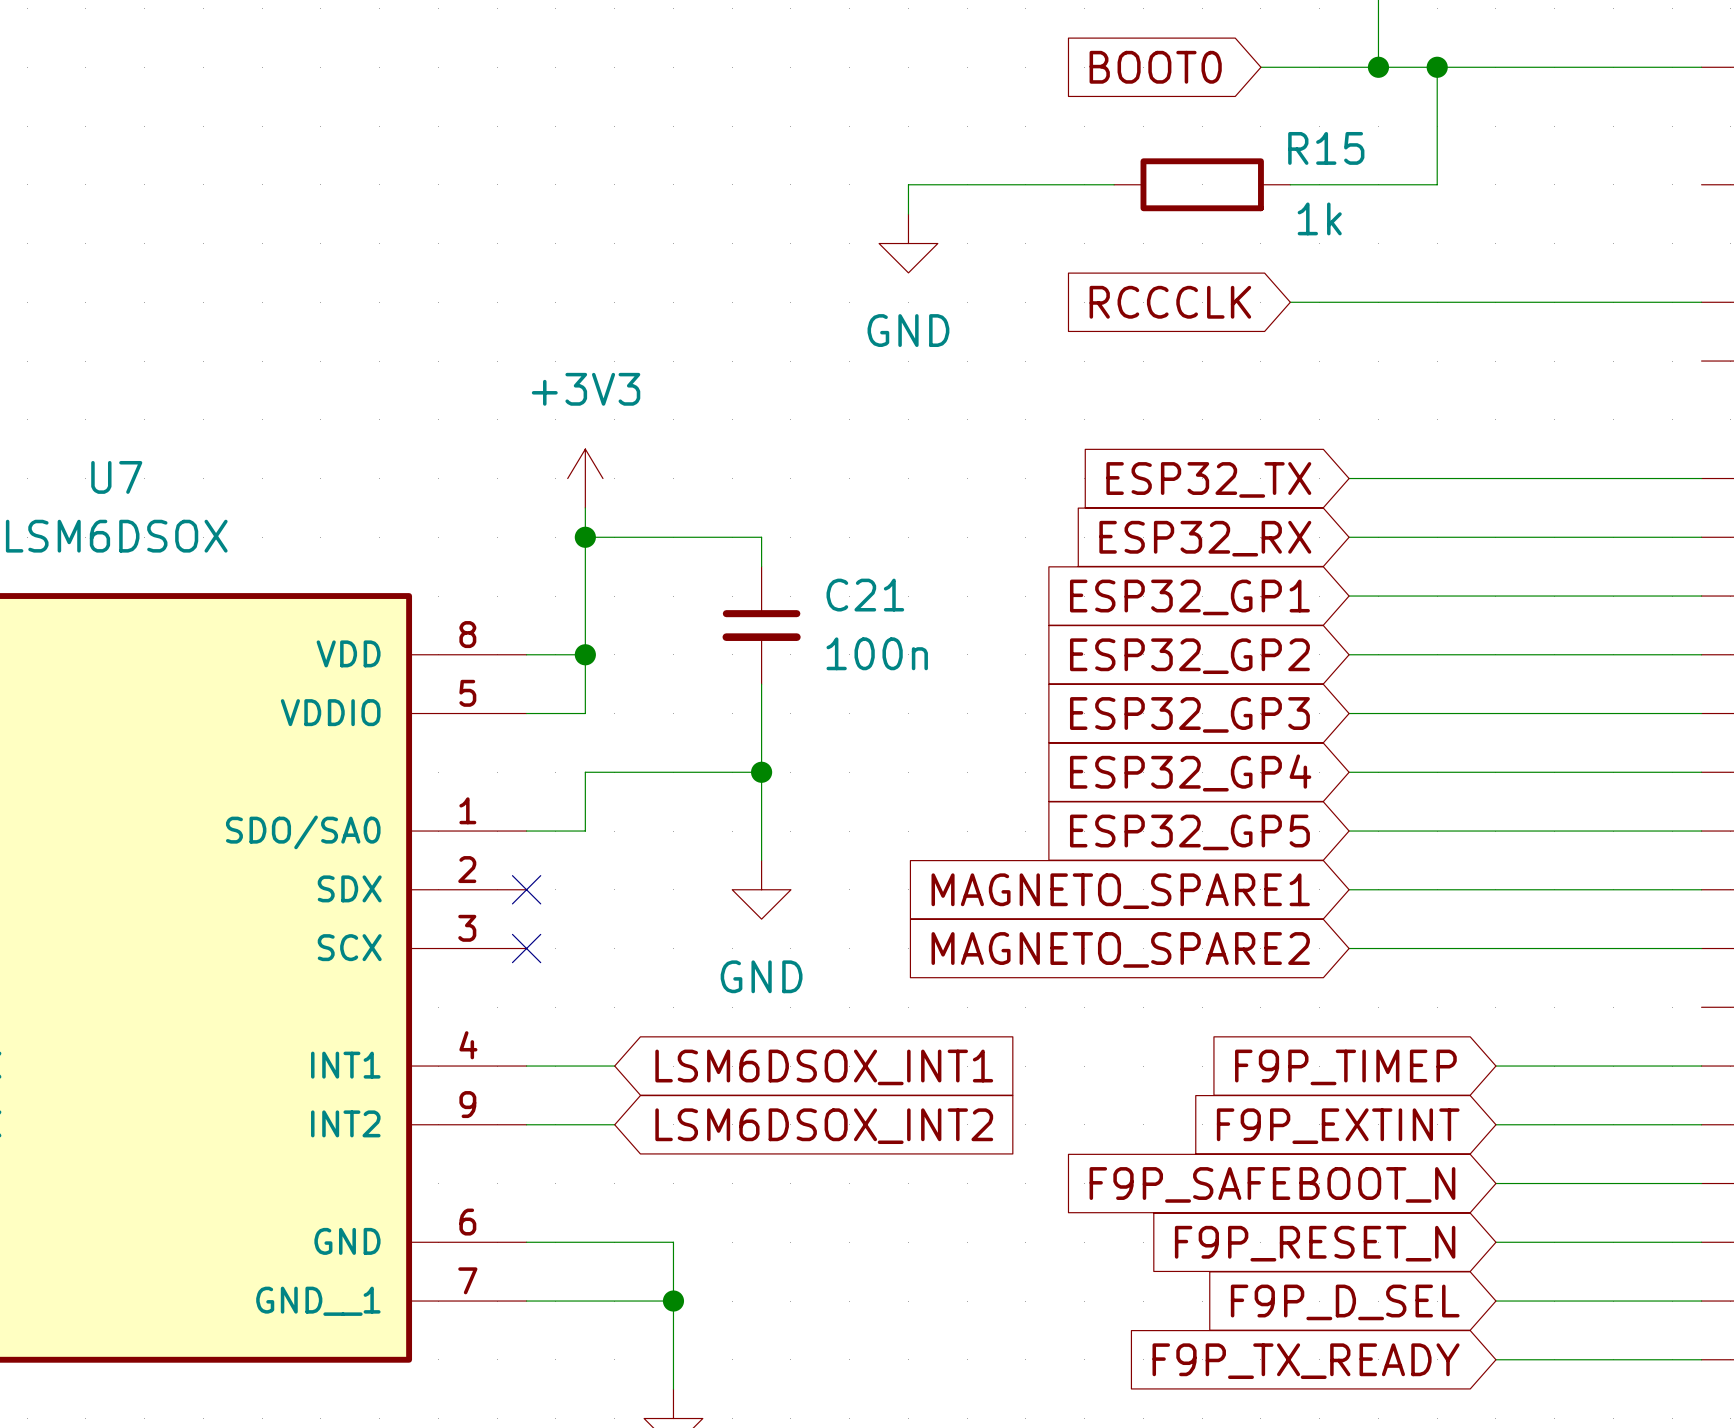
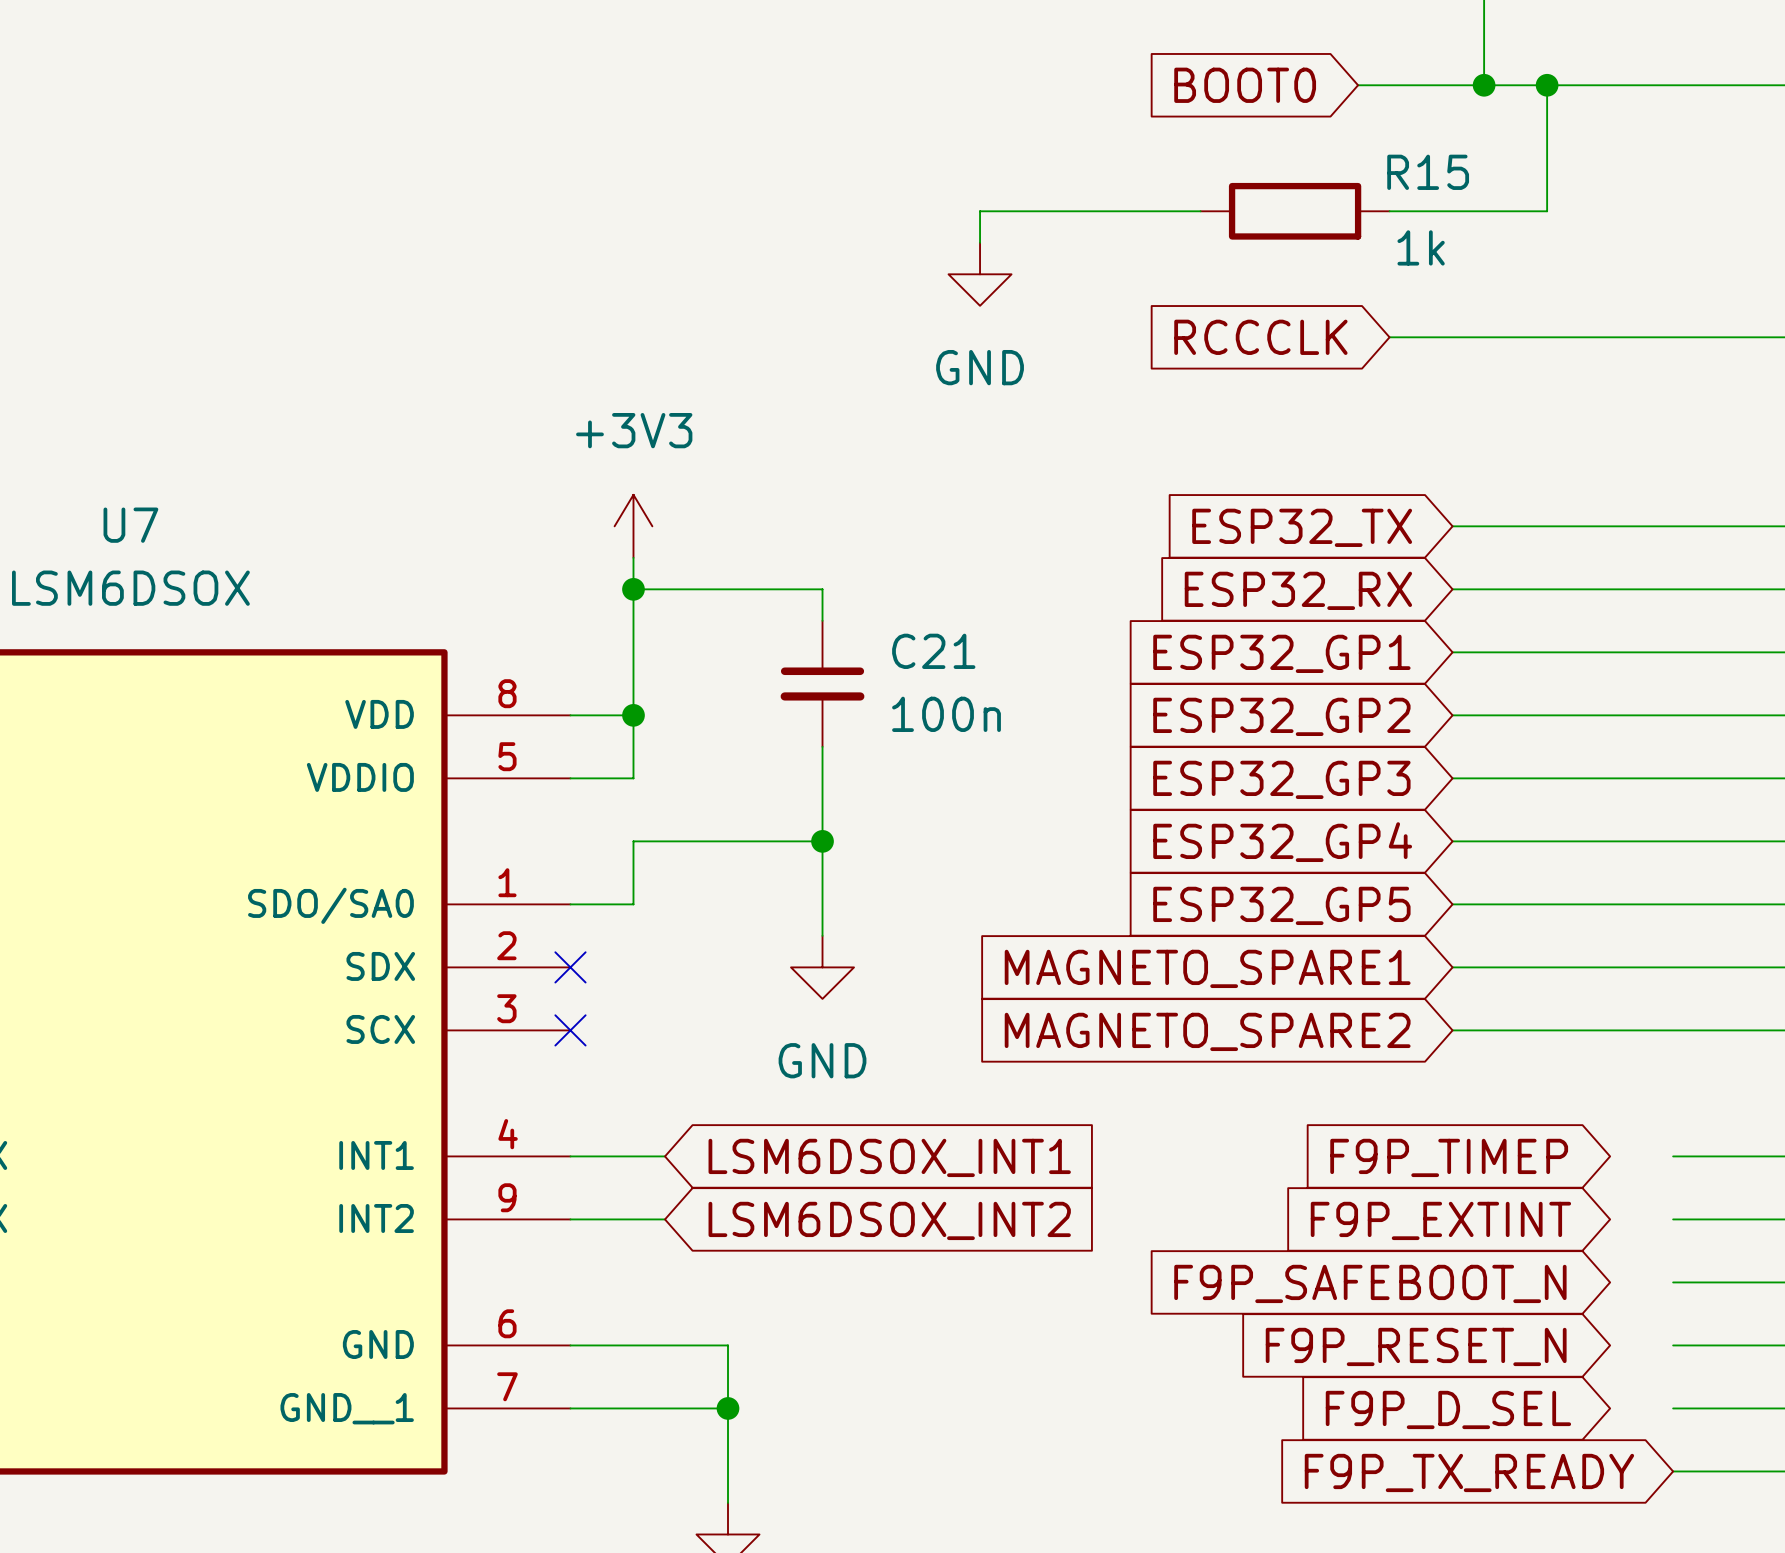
wire: (1495, 1066) (1554, 1066) -> none
wire: (1495, 1124) (1554, 1124) -> none
wire: (1495, 1183) (1554, 1183) -> none
wire: (1495, 1242) (1554, 1242) -> none
wire: (1495, 1301) (1554, 1301) -> none
wire: (1495, 1359) (1554, 1359) -> none
global label position: F9P_TX_READY (1306, 1361) -> F9P_TX_READY (1469, 1472)

